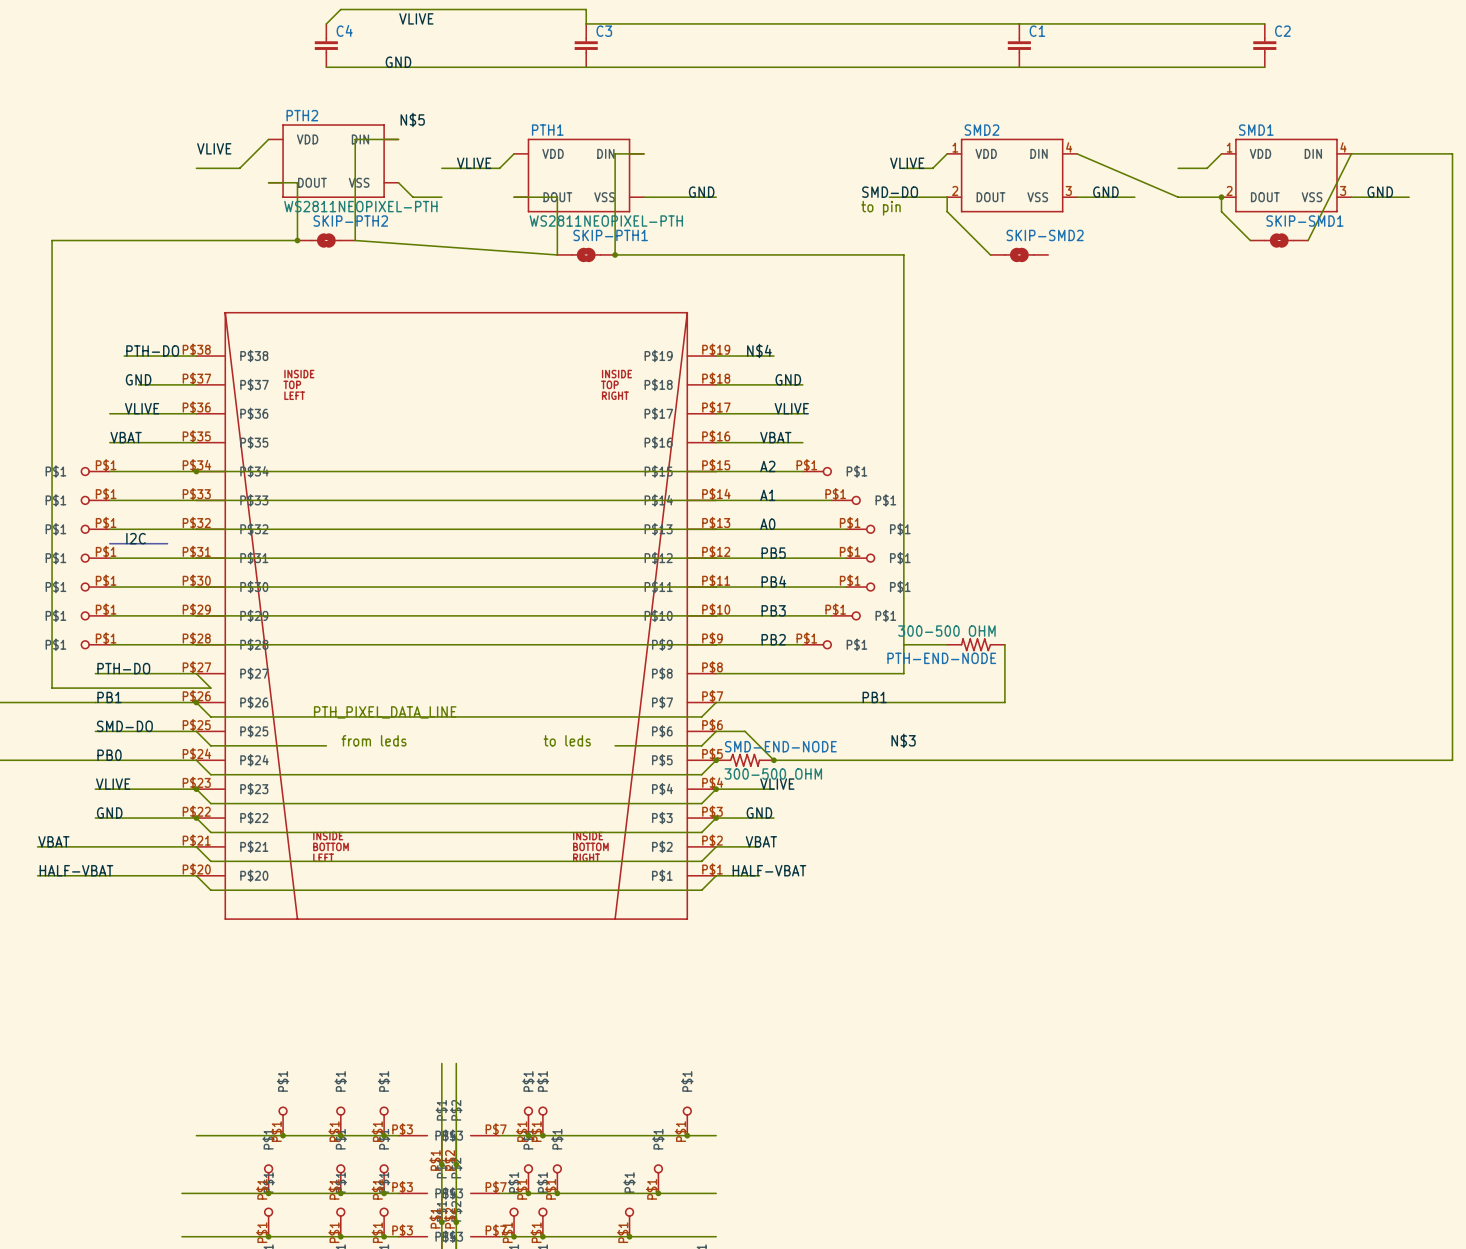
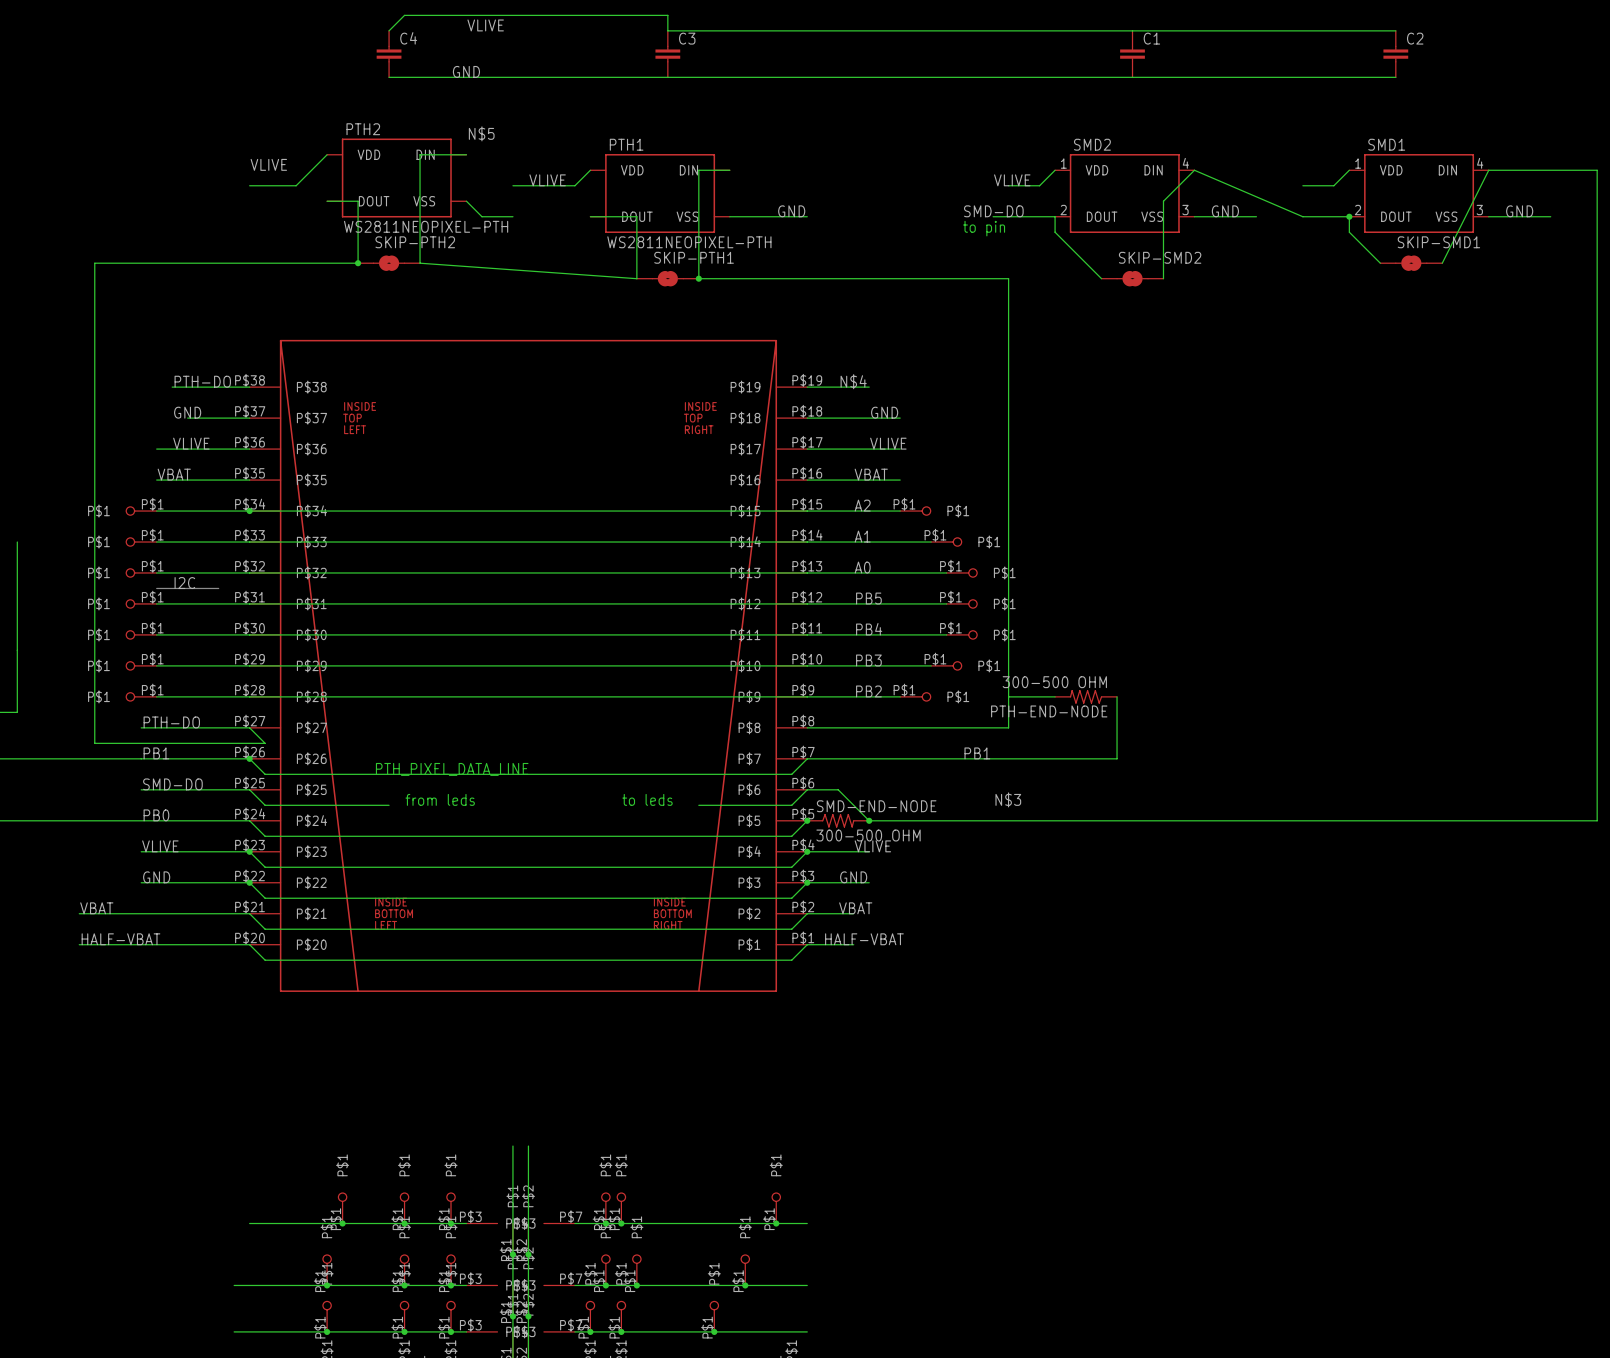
wire: none -> (1194, 170) (1163, 201) (1163, 278)

